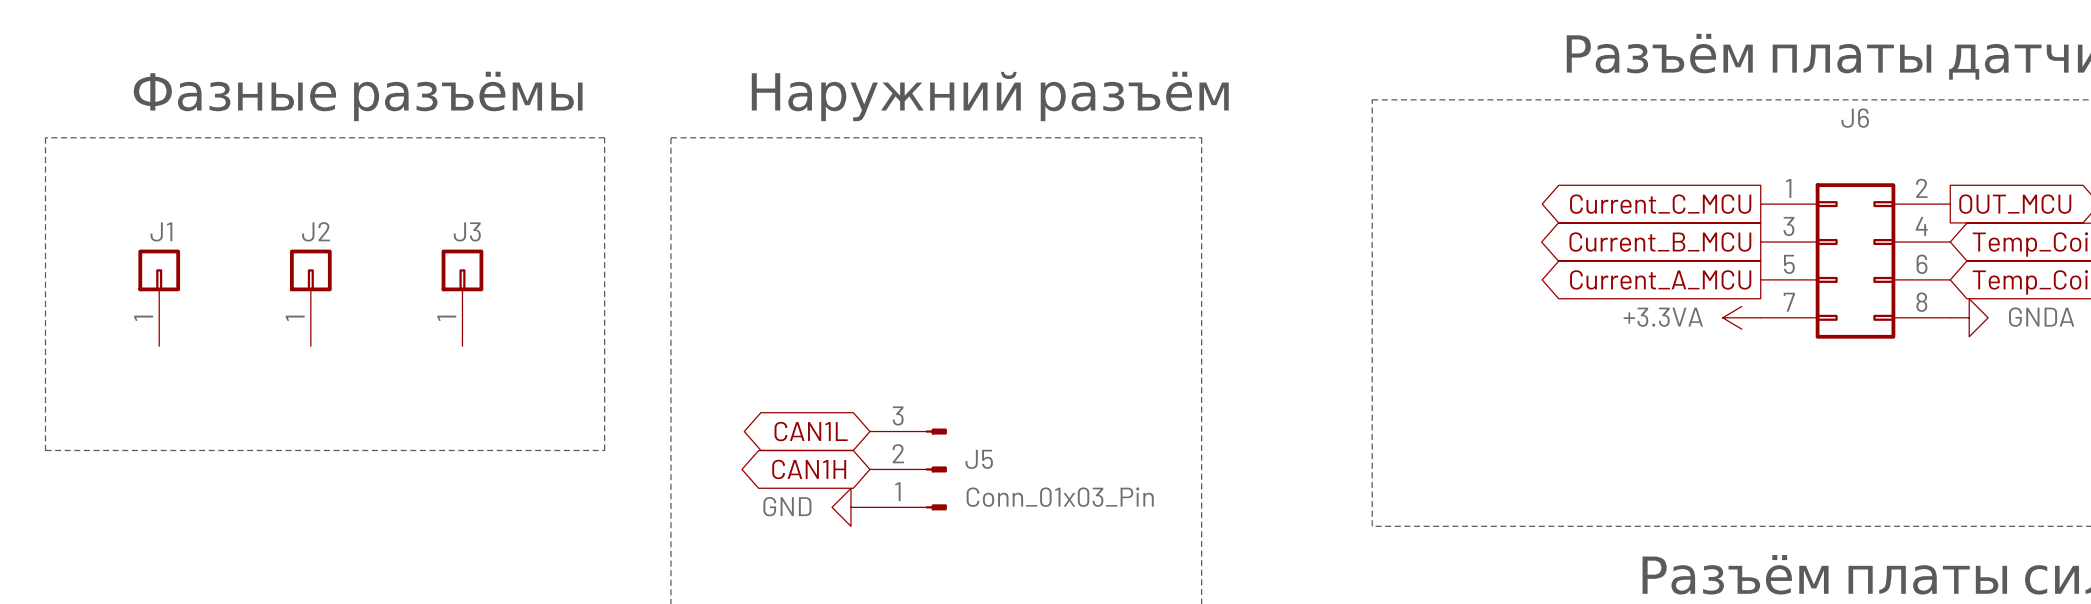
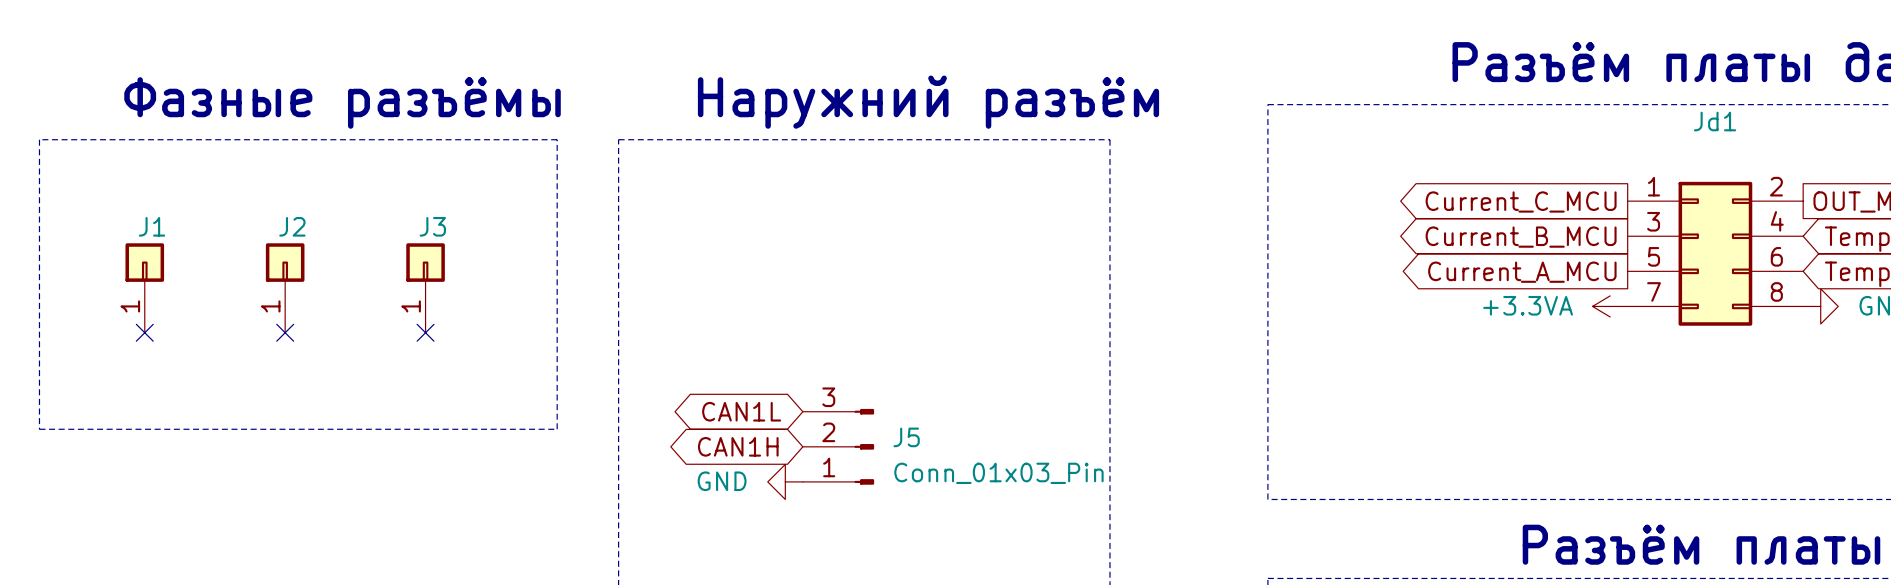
J6 name: J6 (1855, 118) -> Jd1 (1715, 121)
no-connect mark: none -> (144, 332)
no-connect mark: none -> (285, 332)
no-connect mark: none -> (425, 332)

